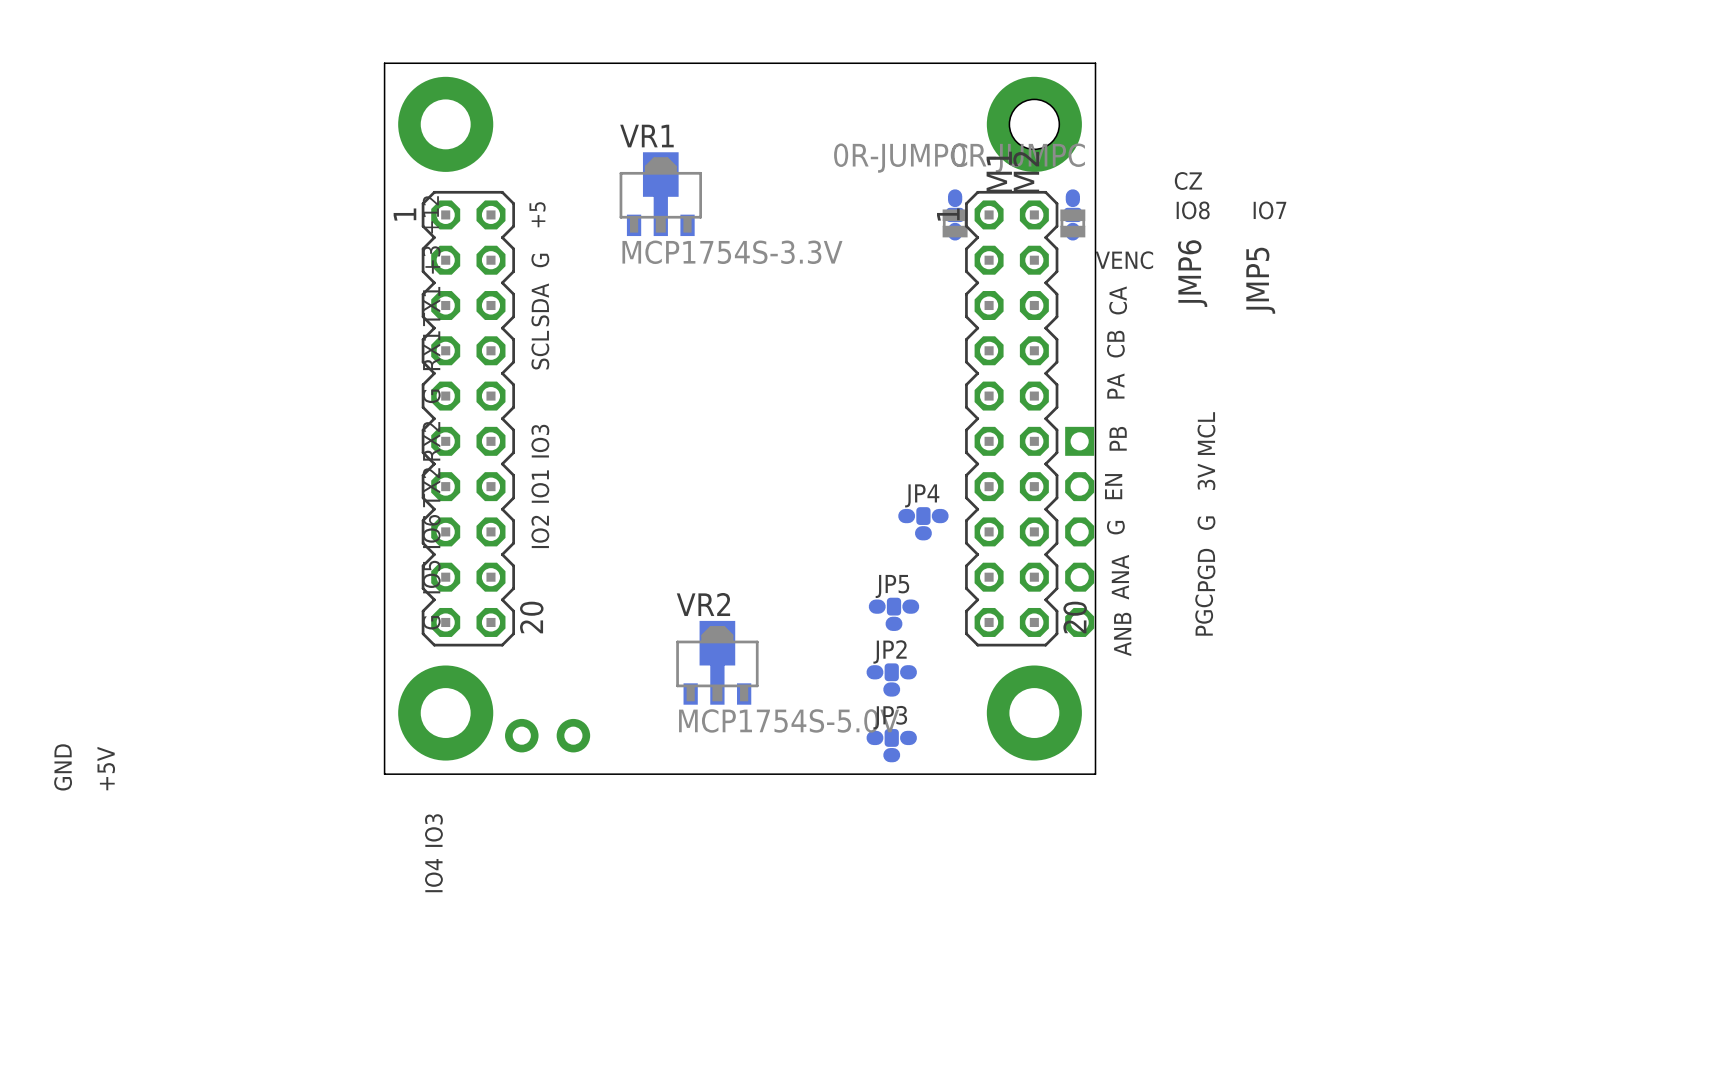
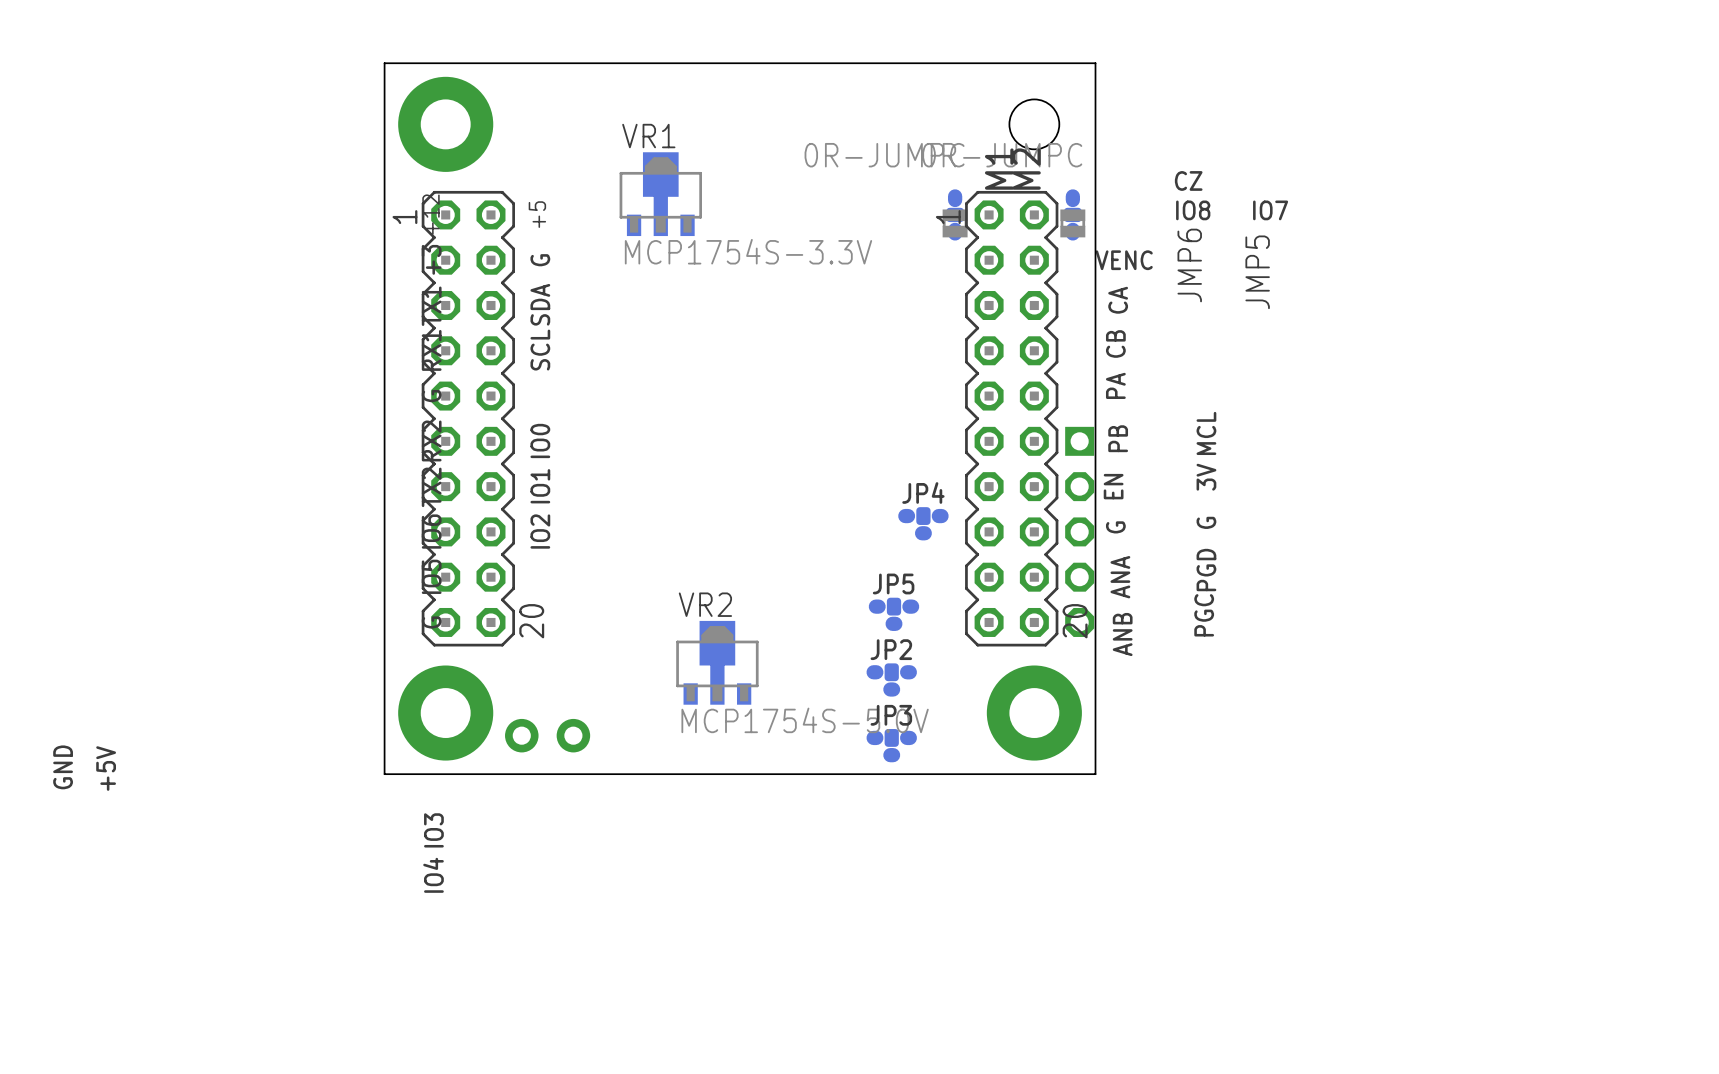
part: (1034, 124) -> none
text: IO3 (540, 441) -> IO0 (540, 440)

